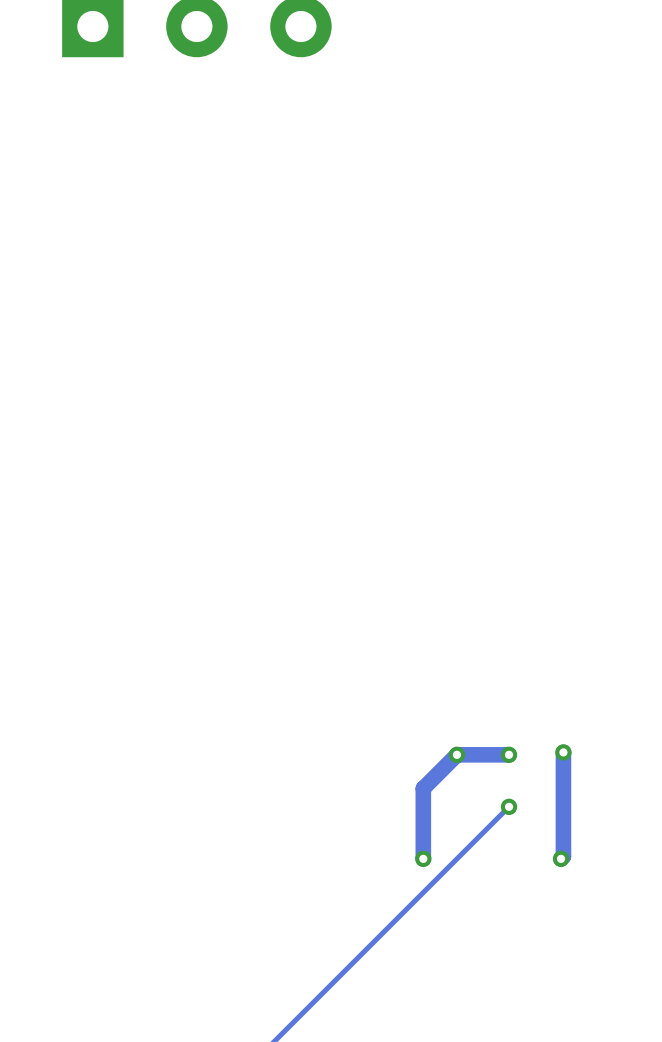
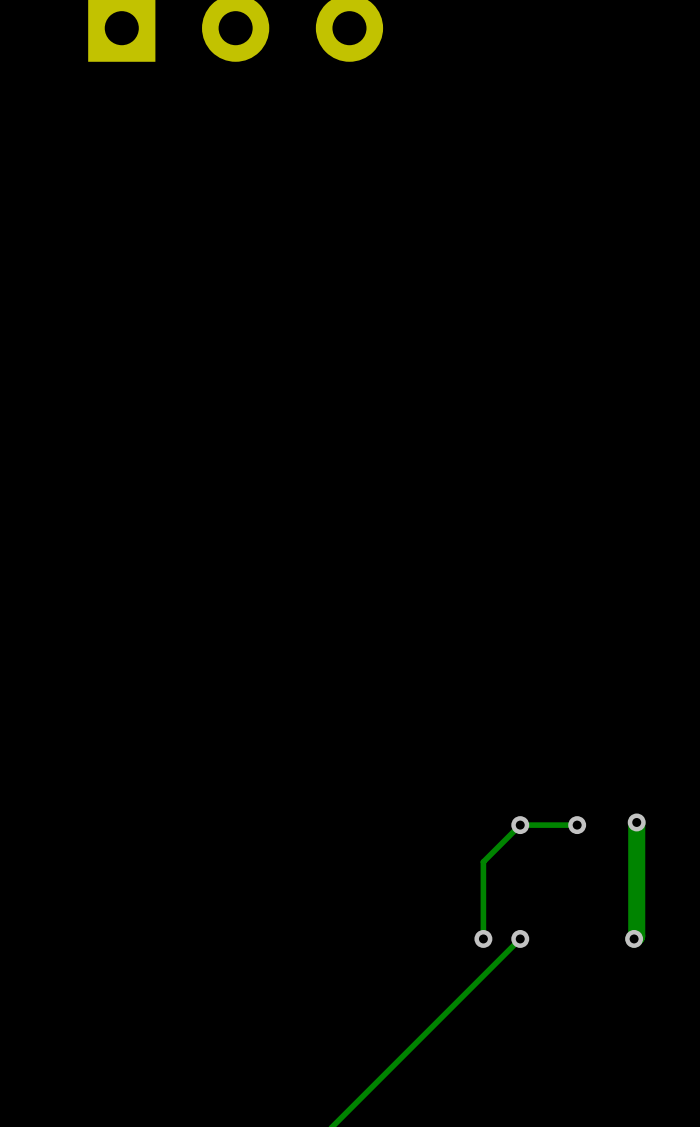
track width: thick (509, 754) (457, 754) (423, 788) (423, 858) -> thin (577, 825) (520, 825) (483, 861) (483, 938)
track: (509, 806) (457, 858) -> none
via position: (509, 806) -> (520, 938)

